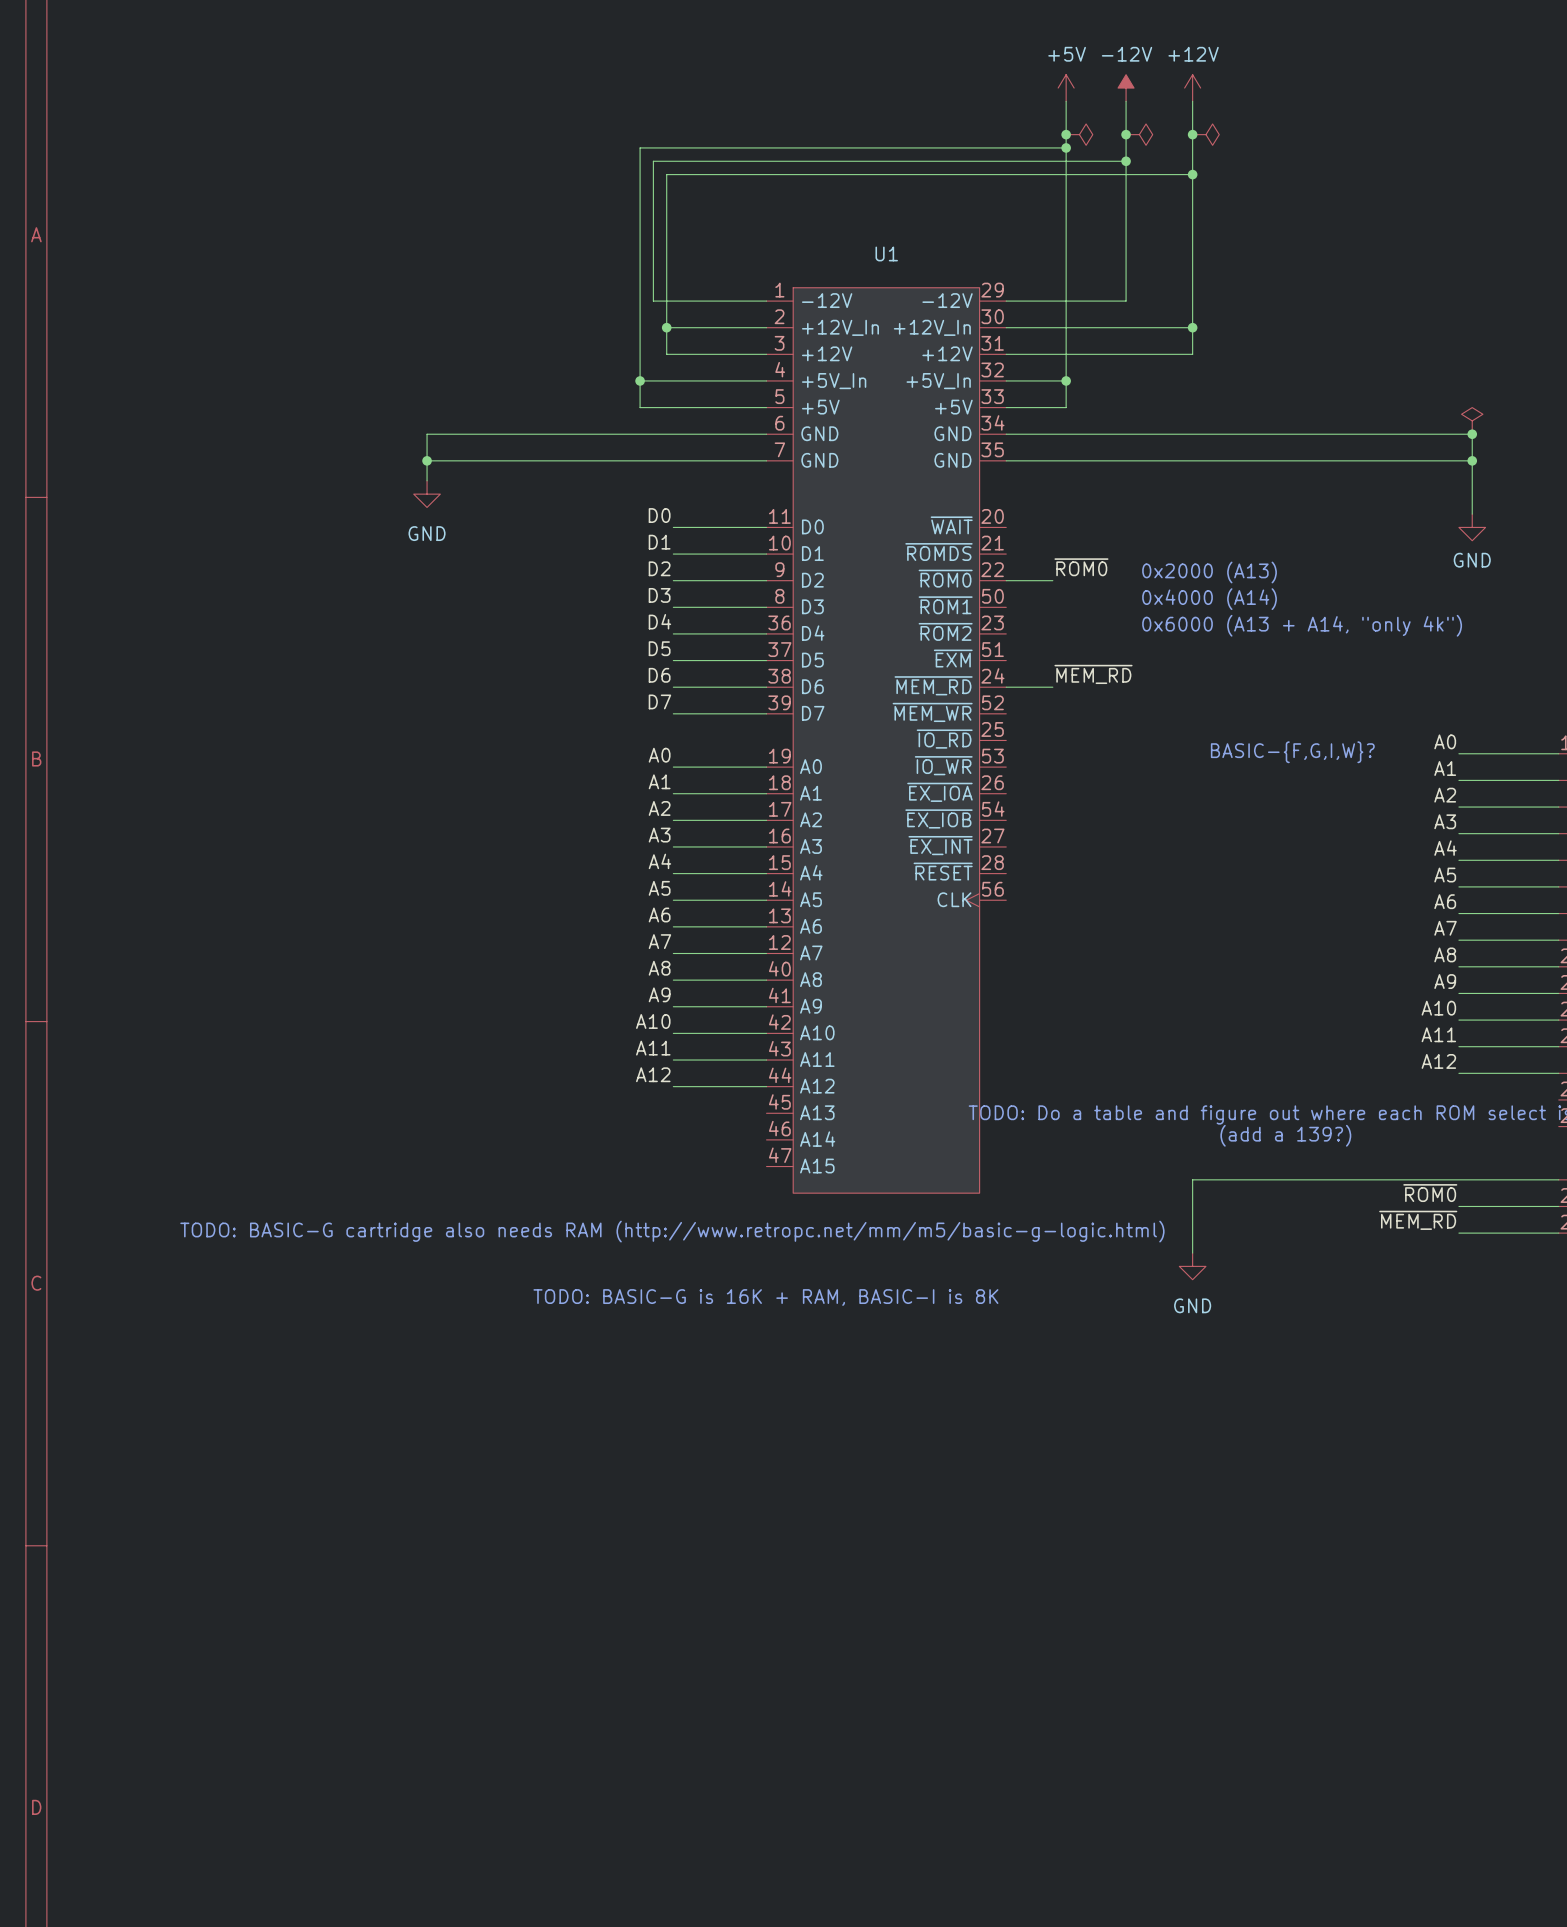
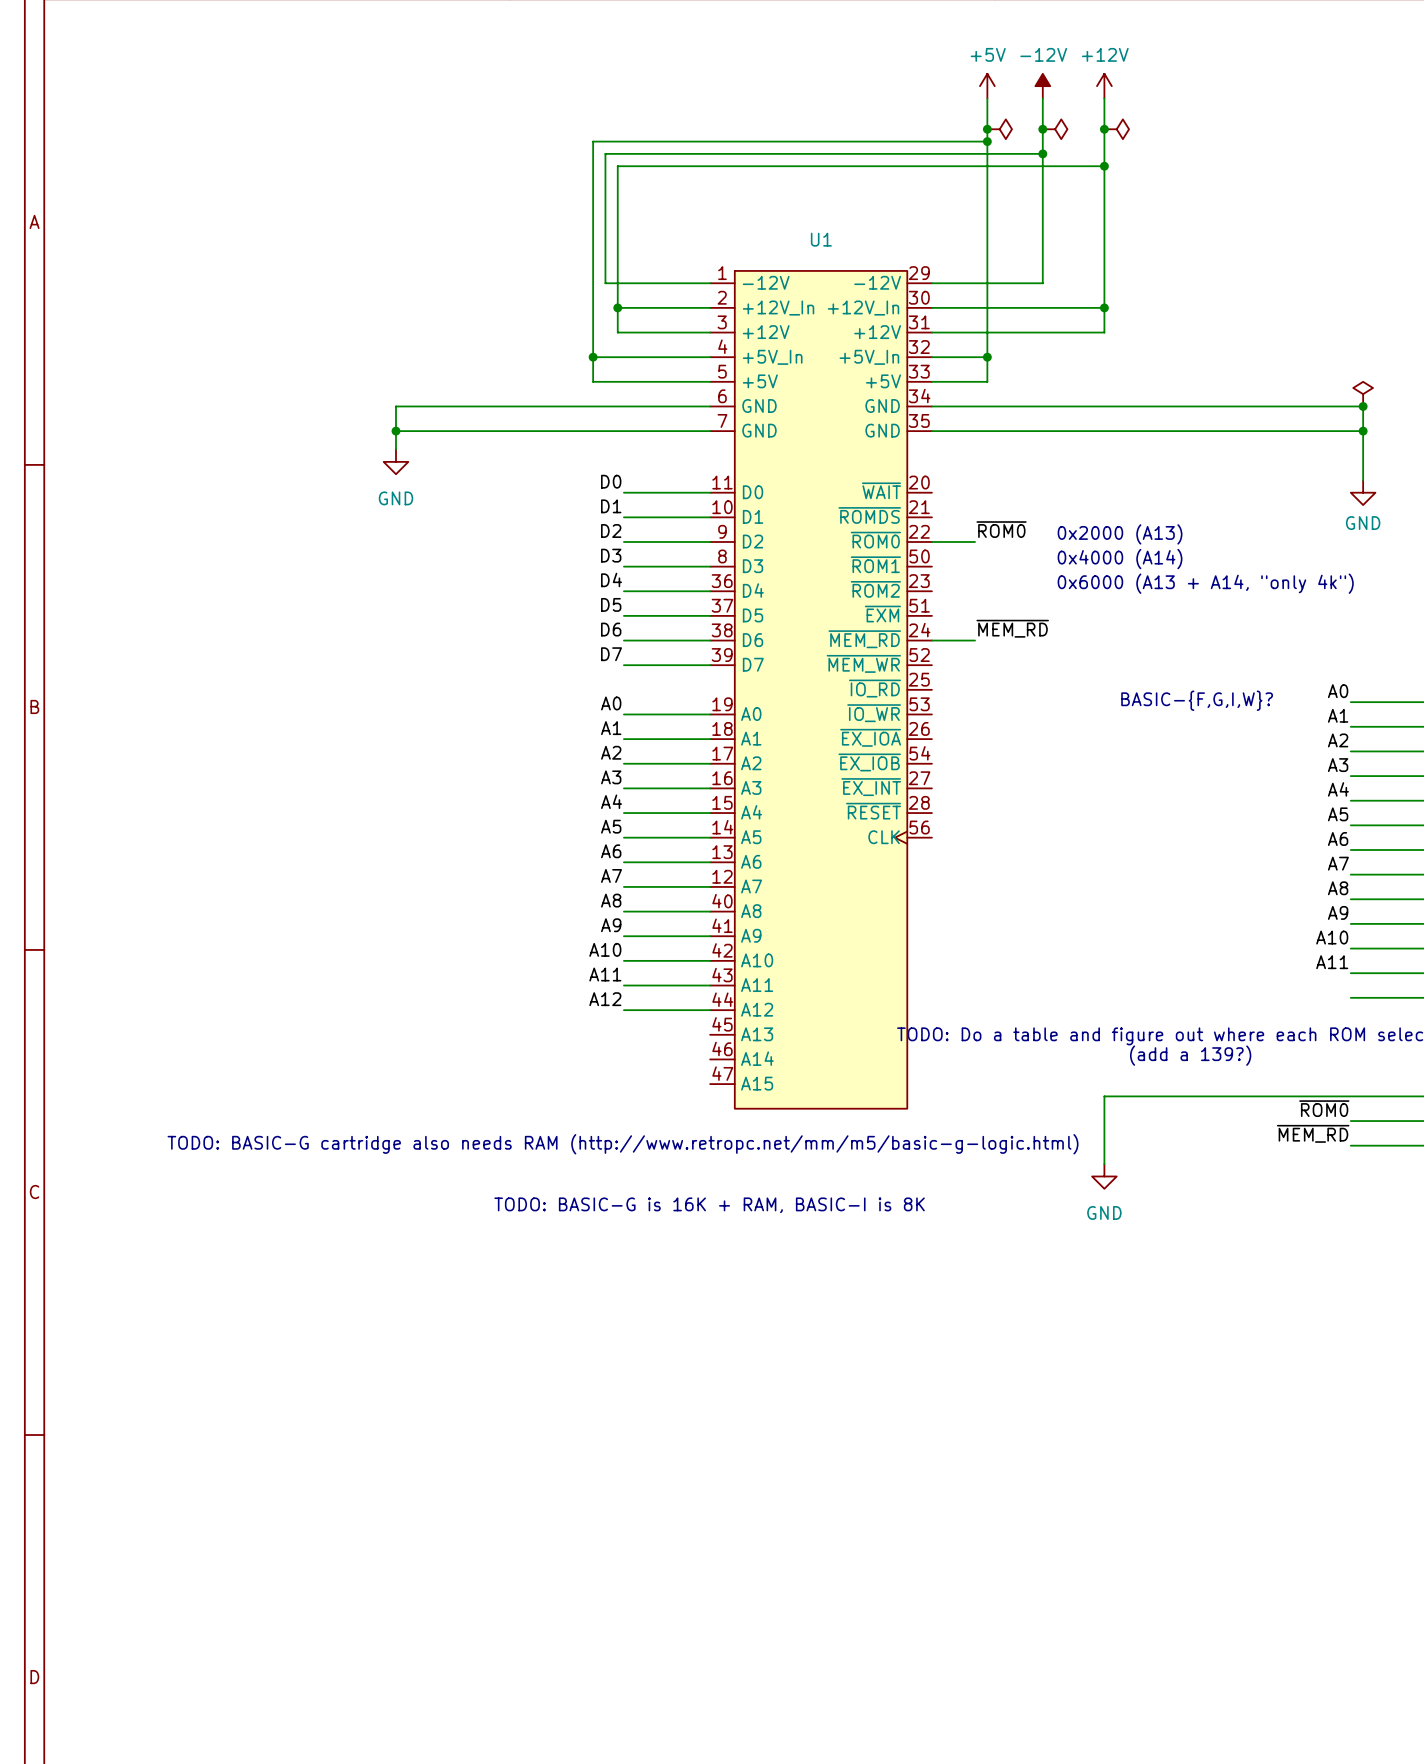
label: A12 (1438, 1061) -> none

